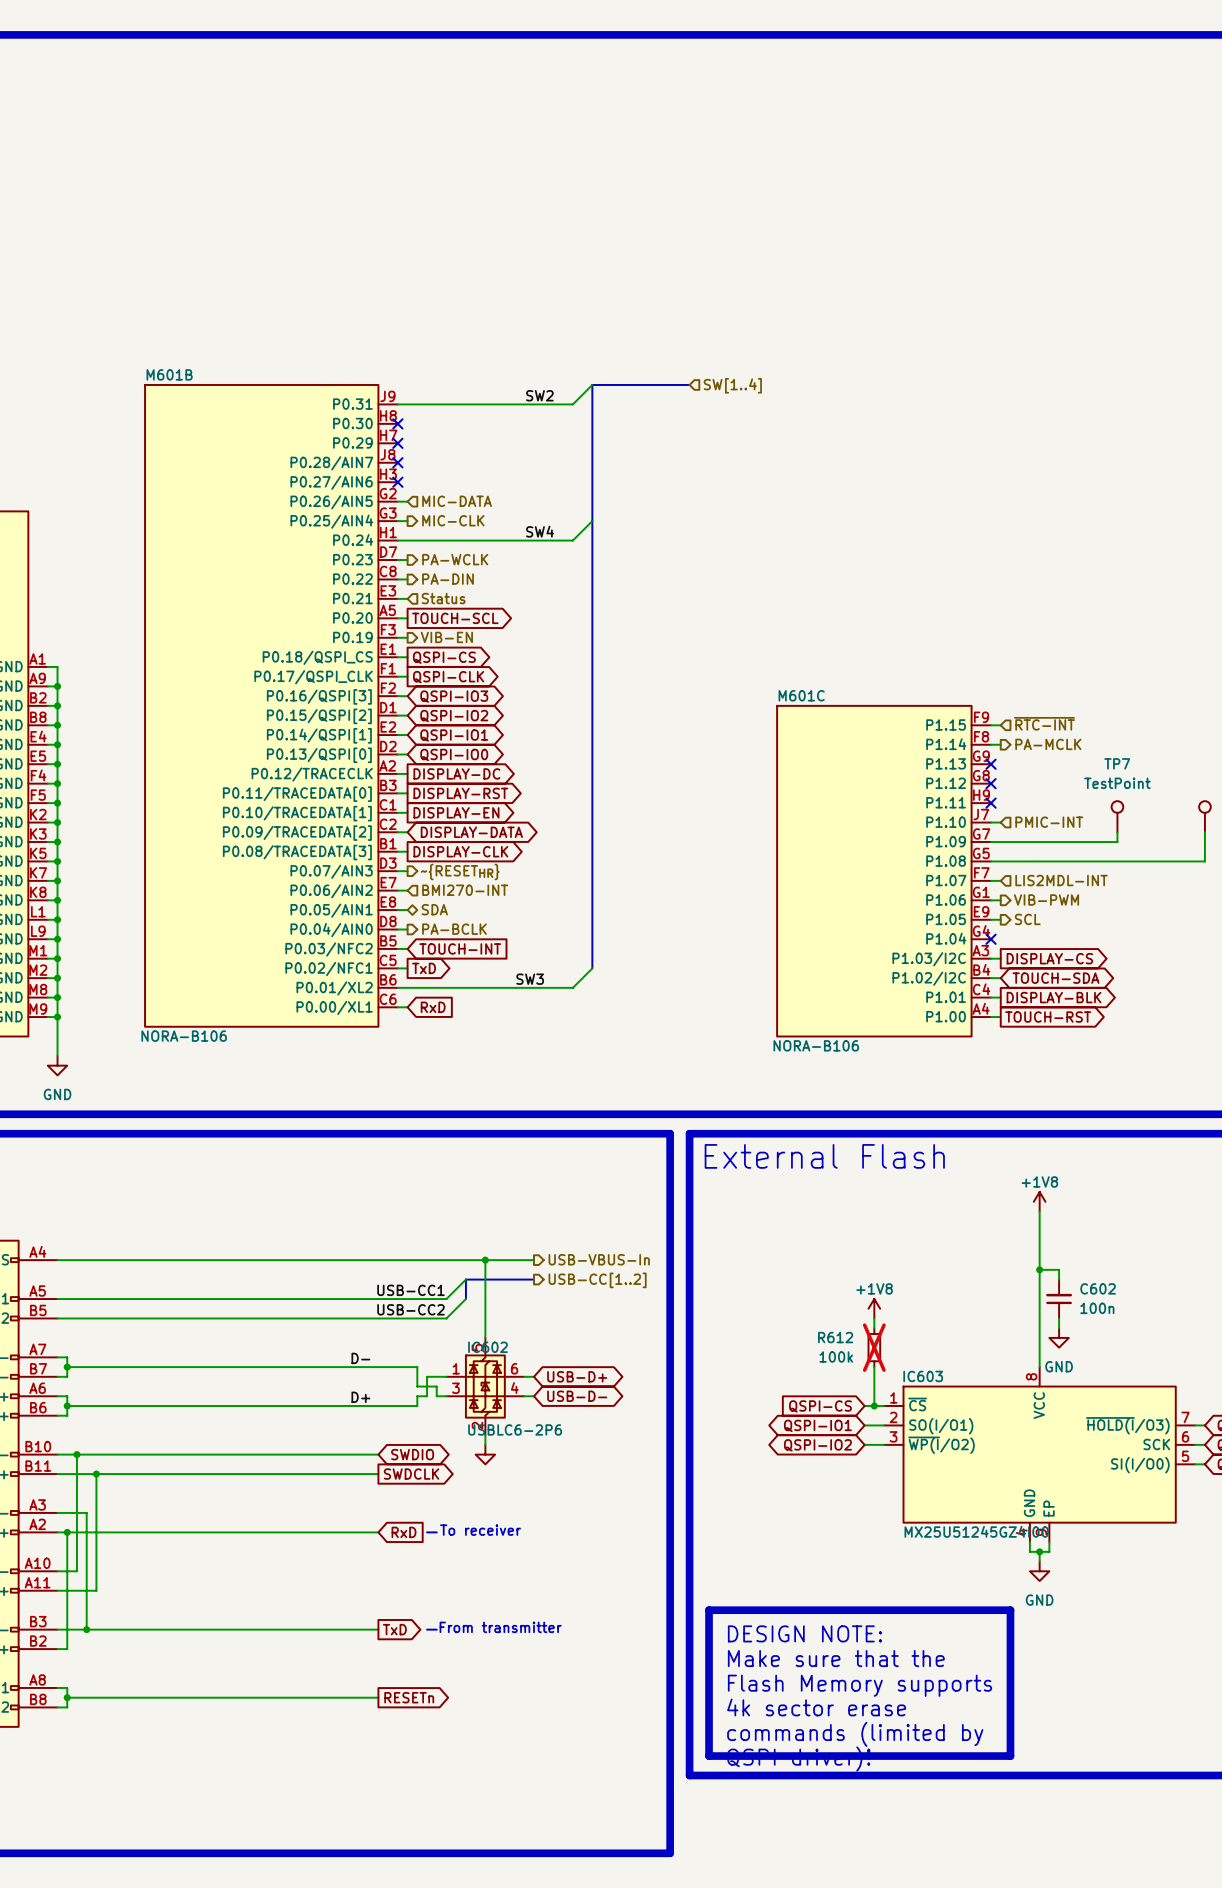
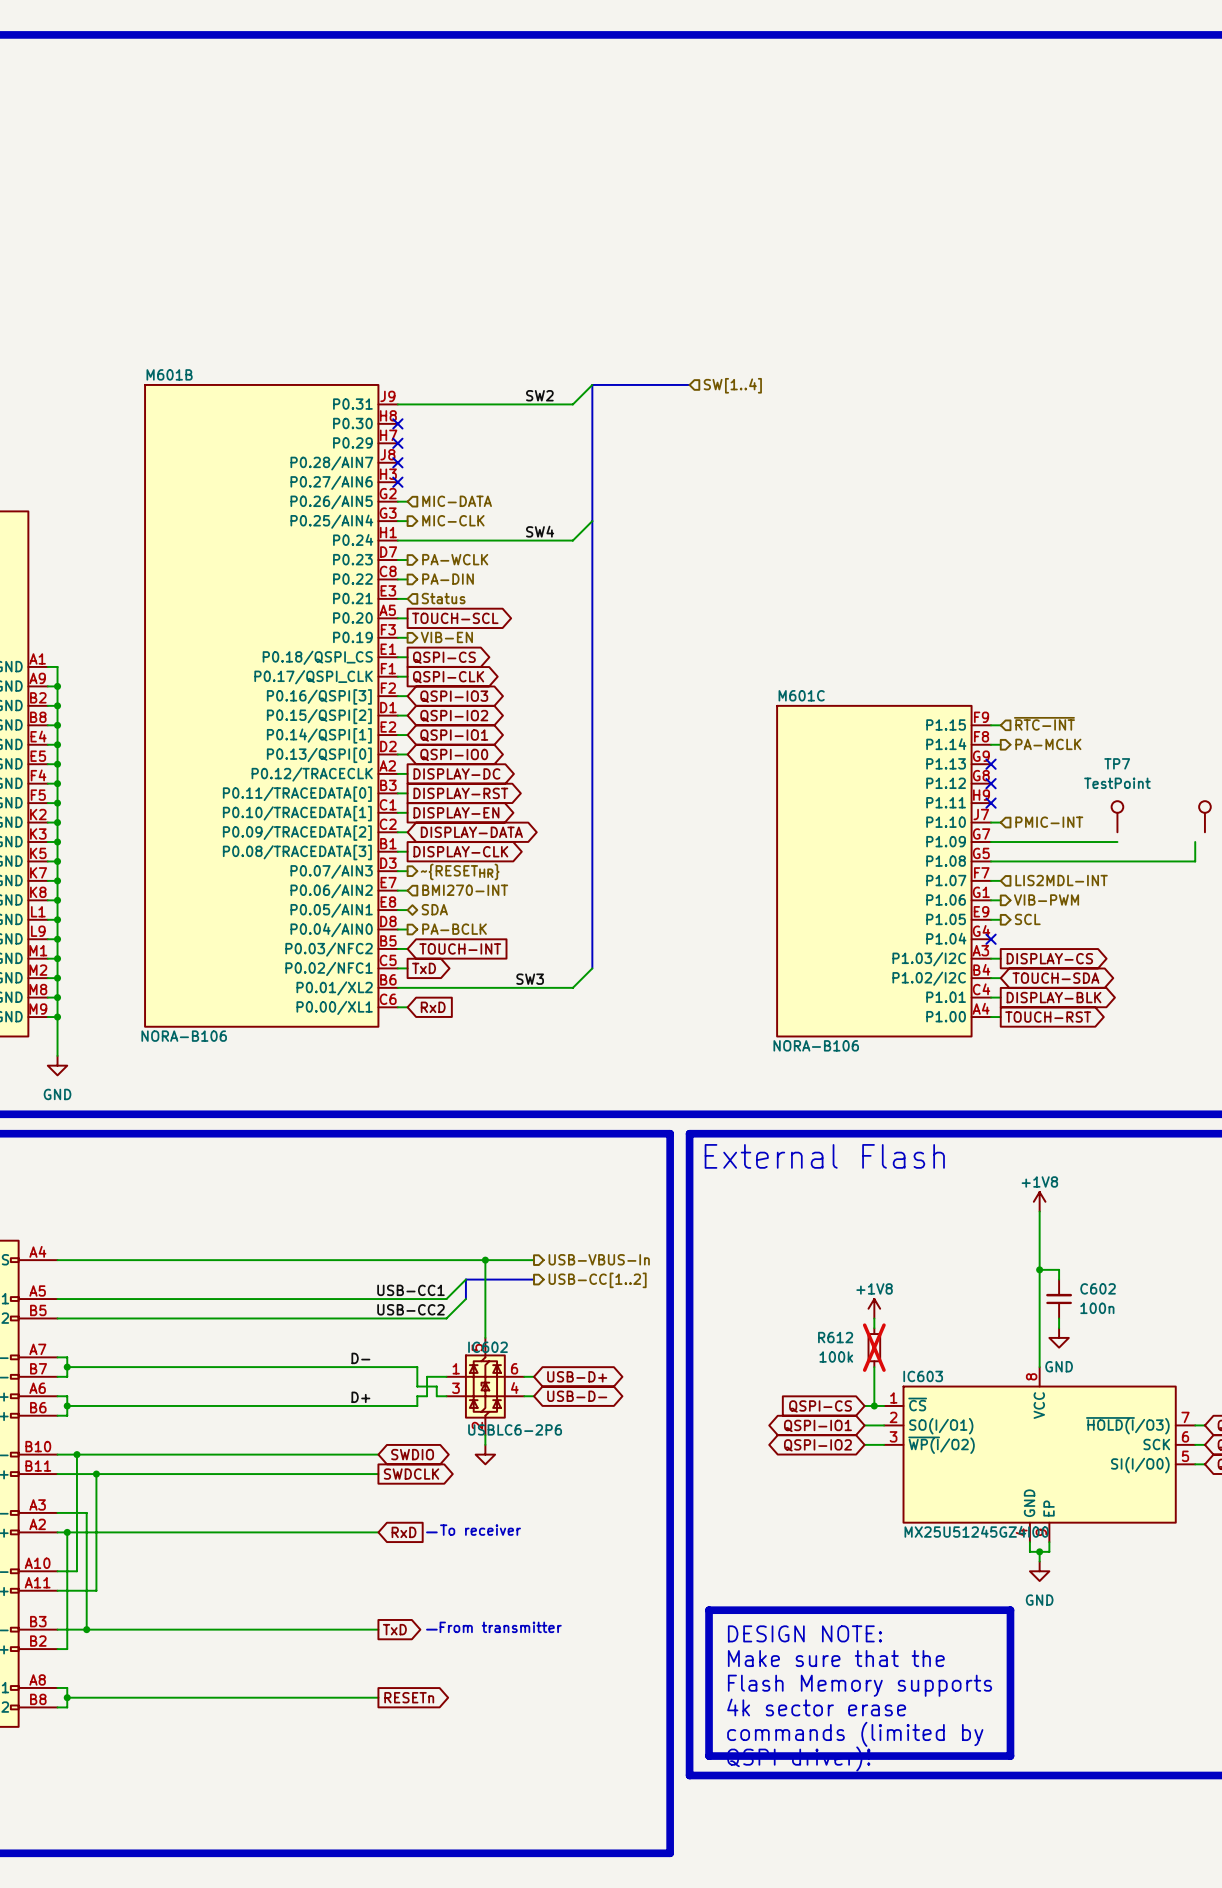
wire: (1117, 832) (1117, 842) -> none
wire: (1204, 832) (1204, 861) (1195, 861) -> (1195, 842) (1195, 861)

